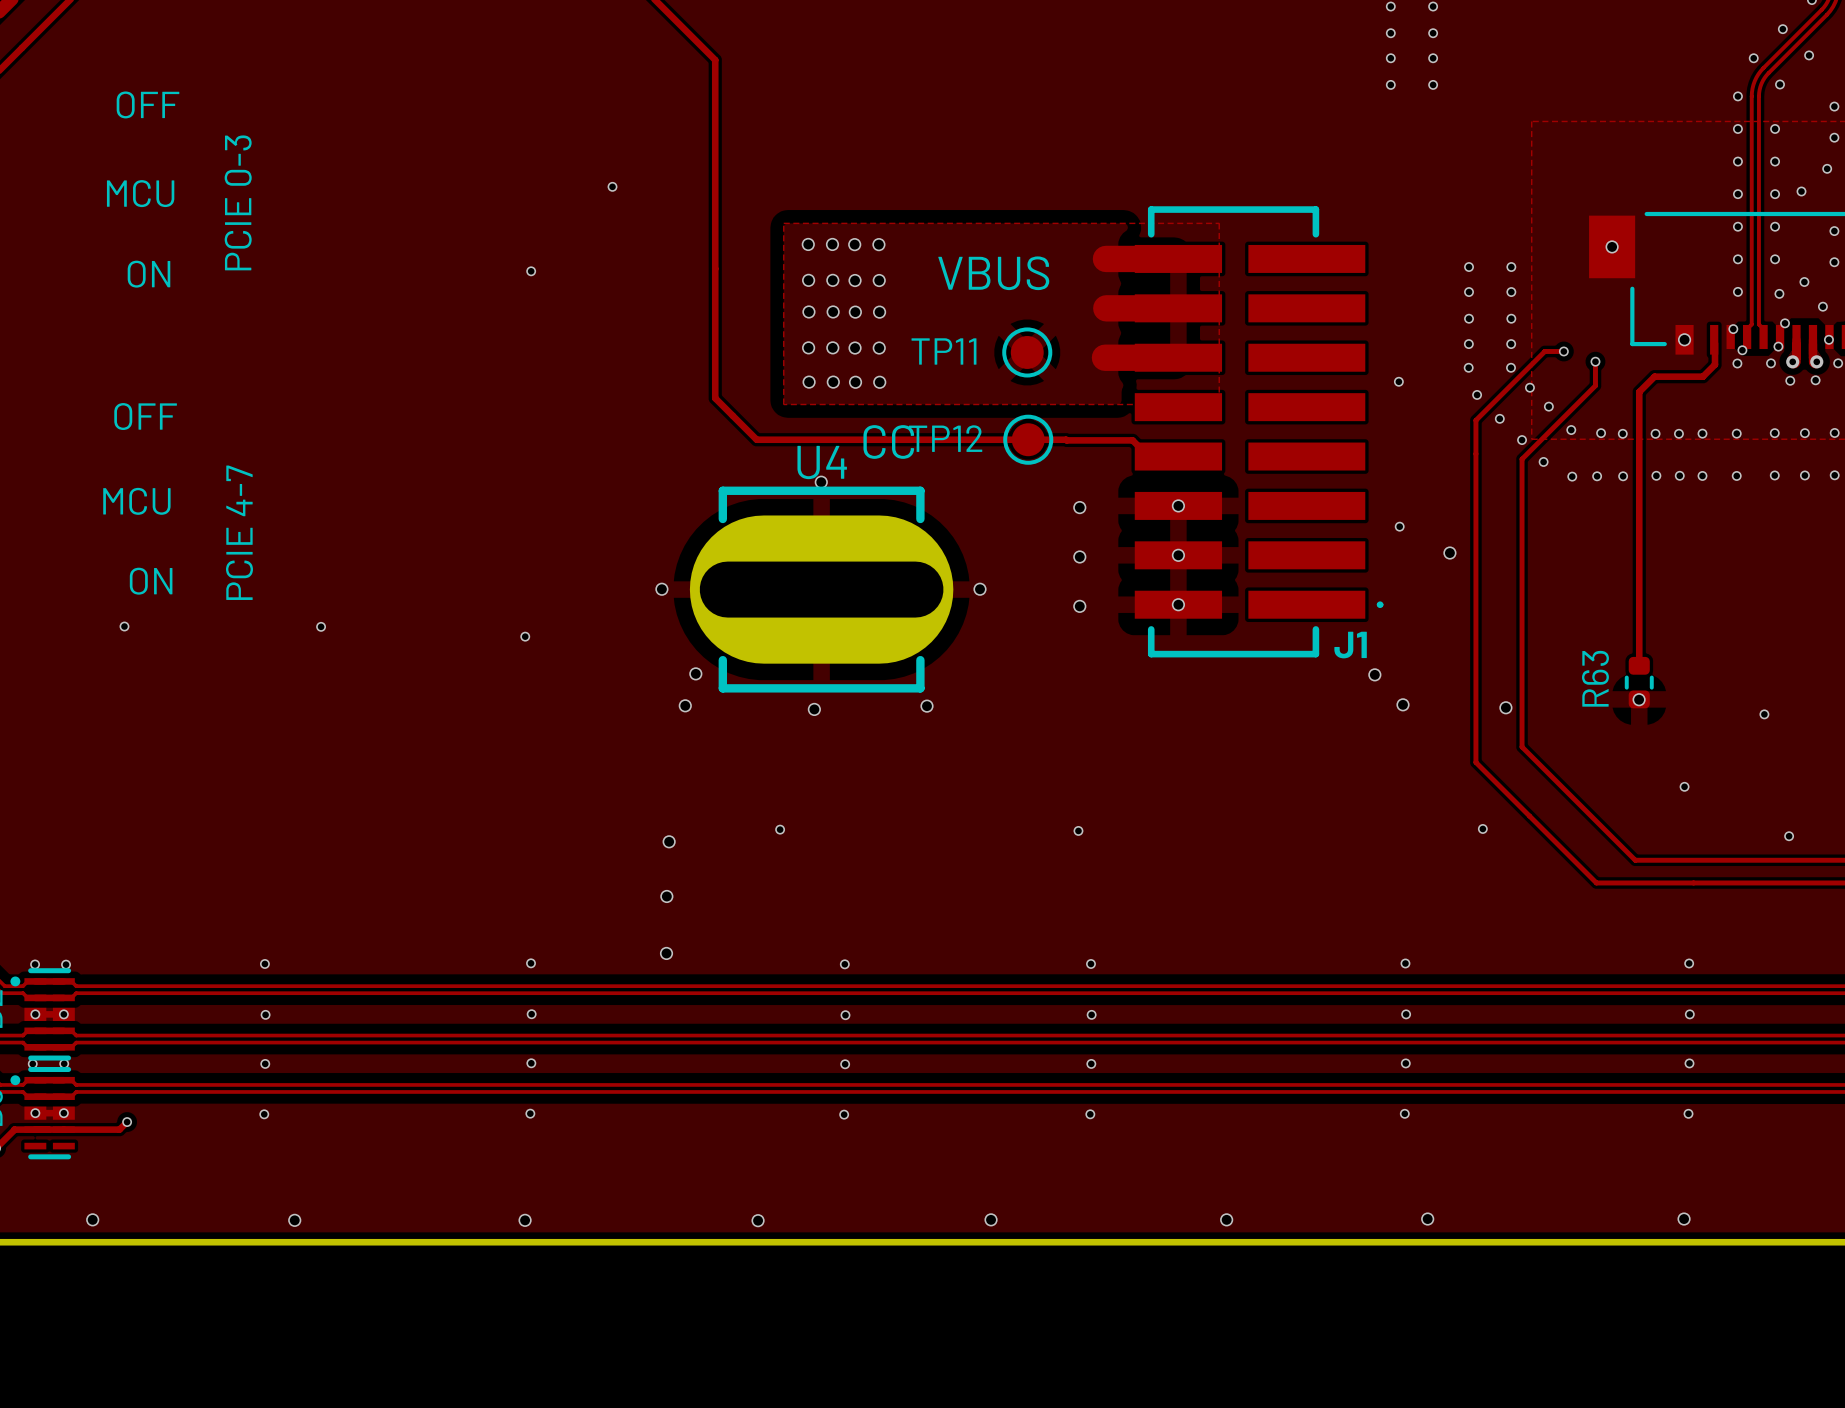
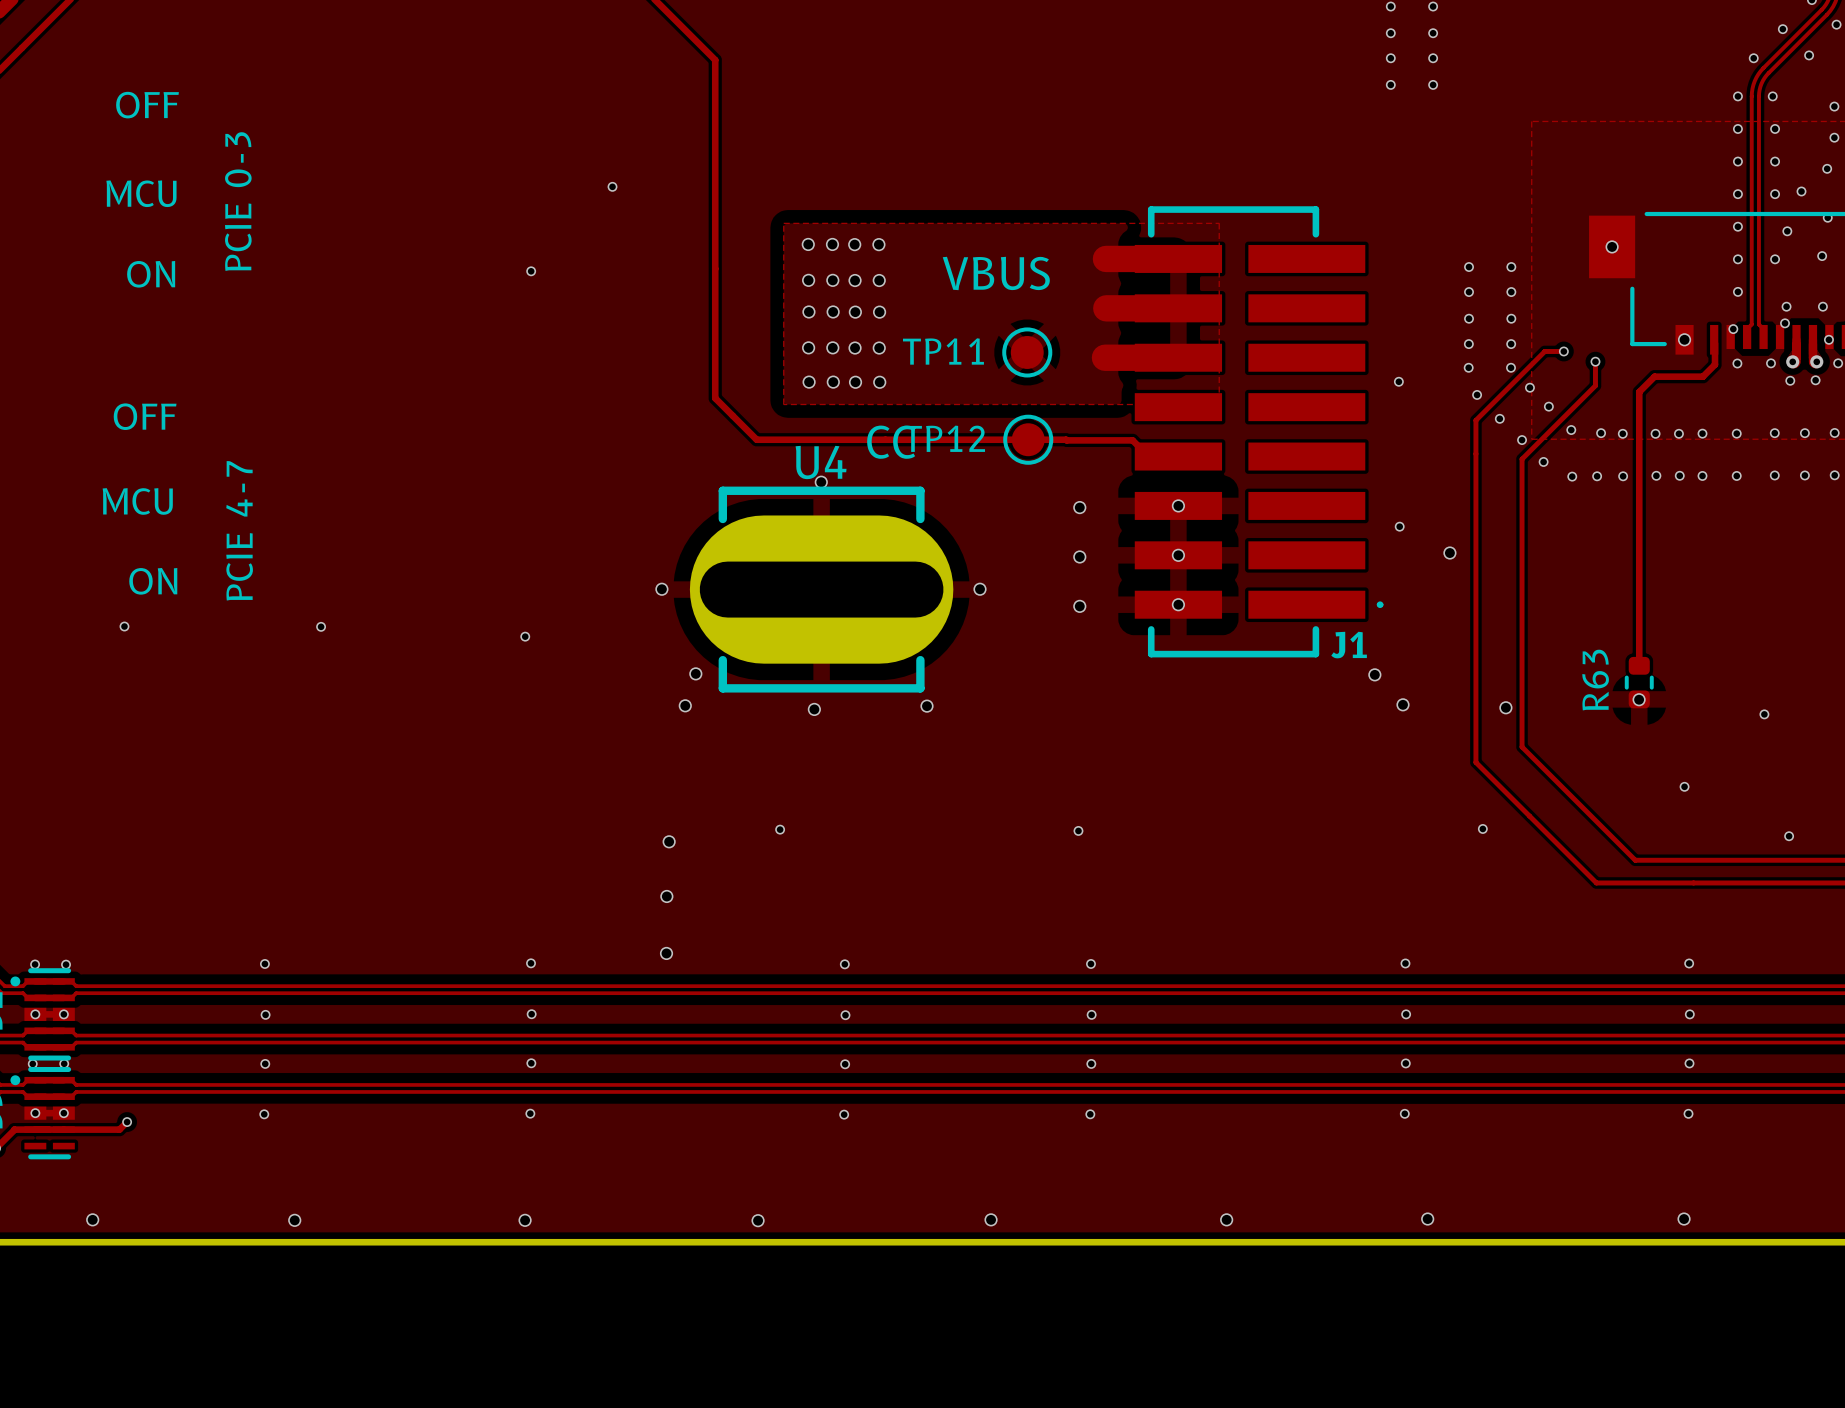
via: none -> (1836, 24)
via position: (1780, 84) -> (1772, 96)
via: none -> (1827, 217)
via position: (1775, 226) -> (1787, 231)
via: (1834, 231) -> none
via: none -> (1822, 256)
via: (1834, 262) -> none
via: (1804, 282) -> none
via position: (1779, 293) -> (1786, 306)
via: (1778, 346) -> none
via: (1742, 350) -> none

